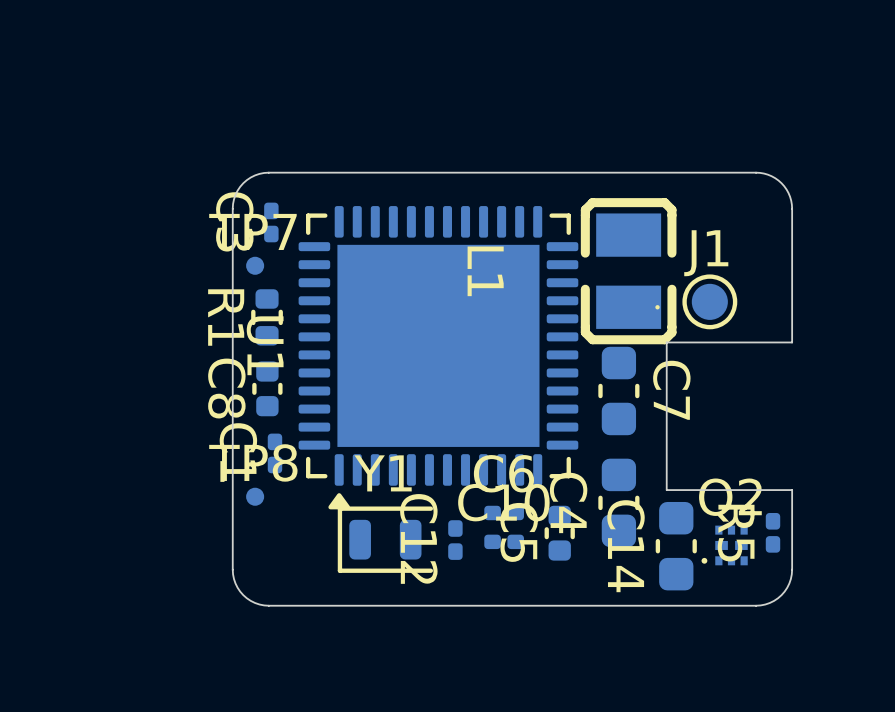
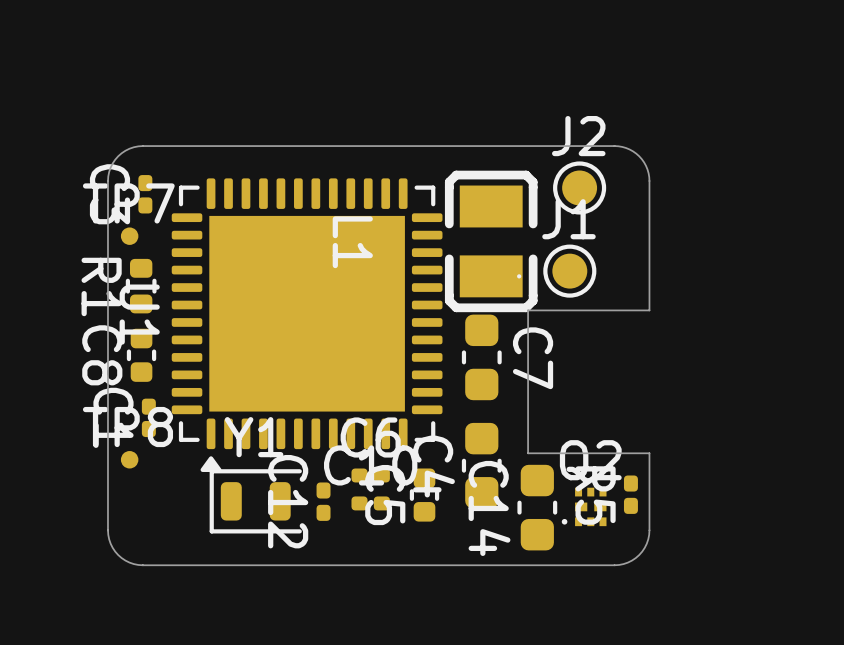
J2: none -> (579, 187)

